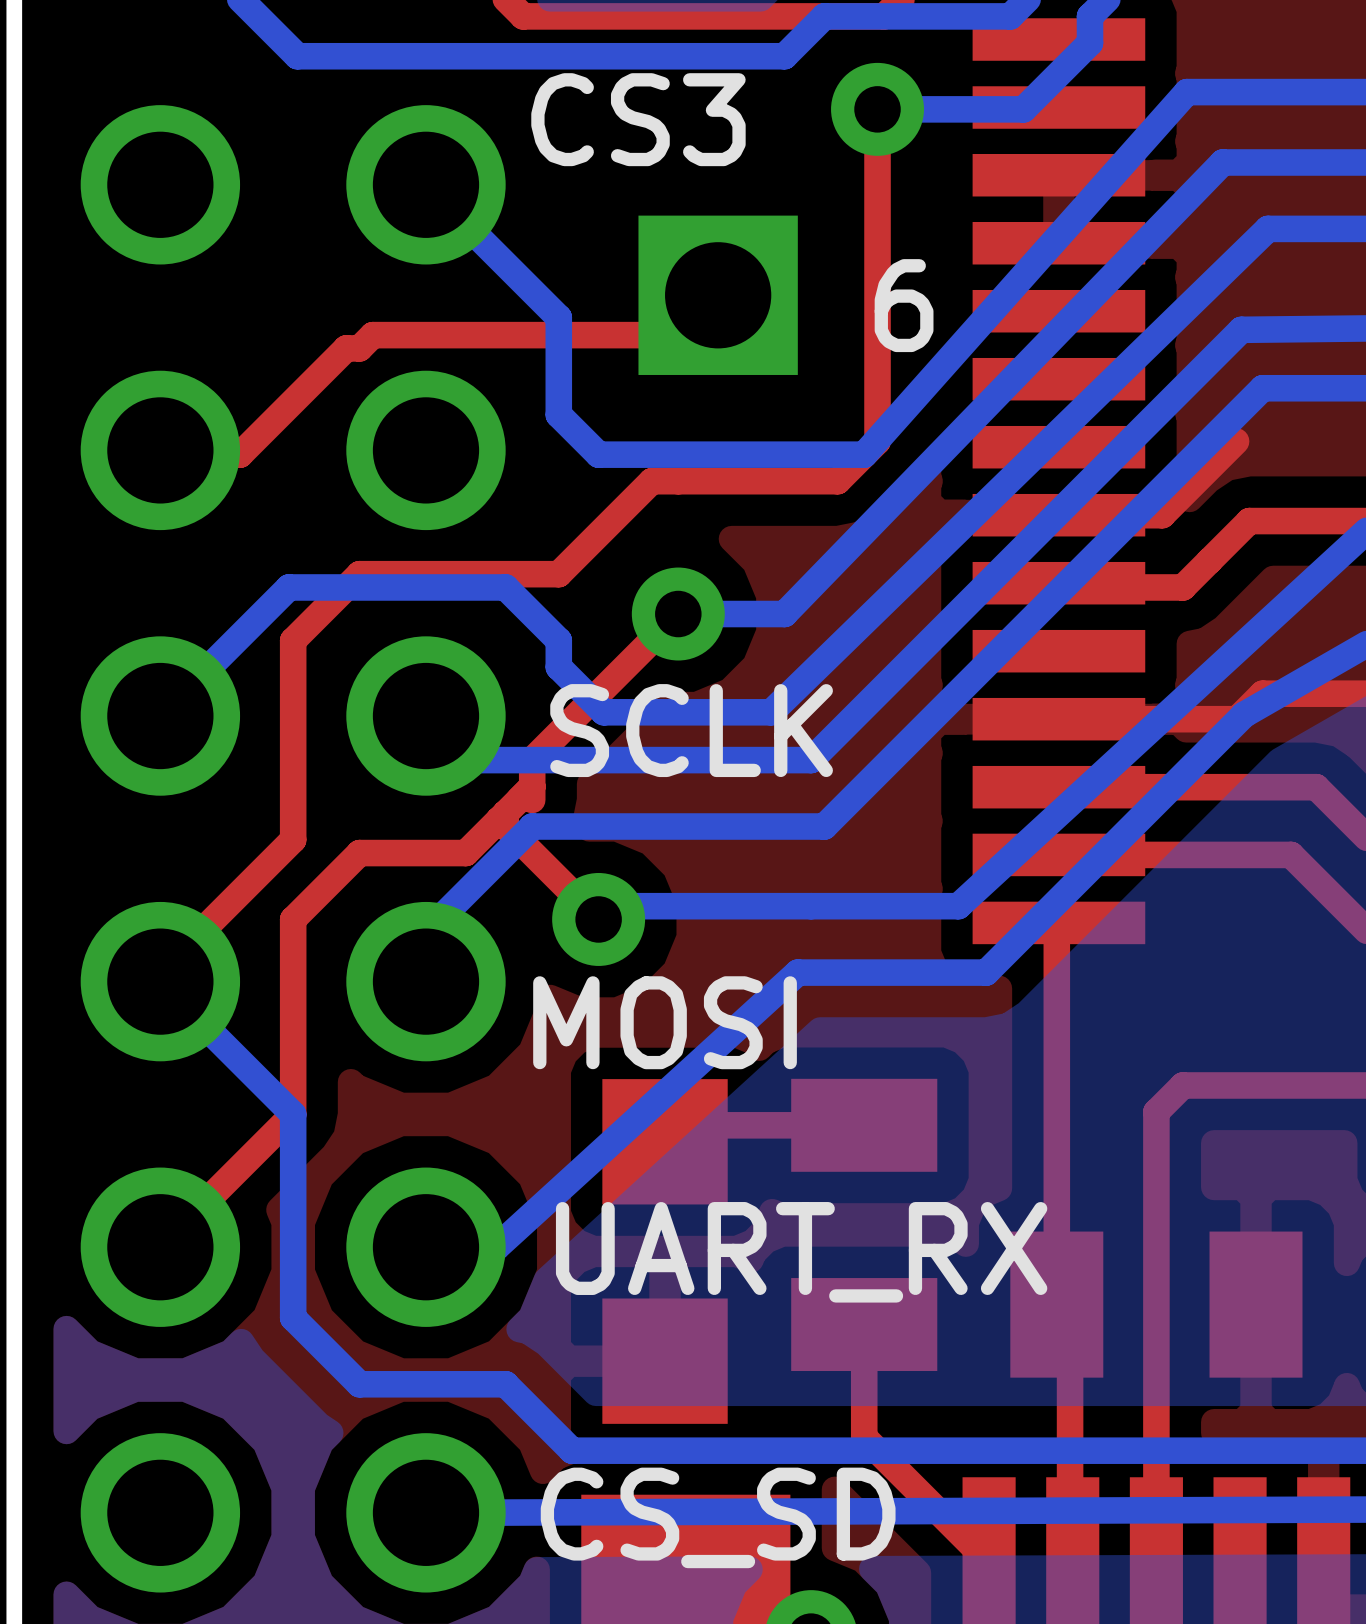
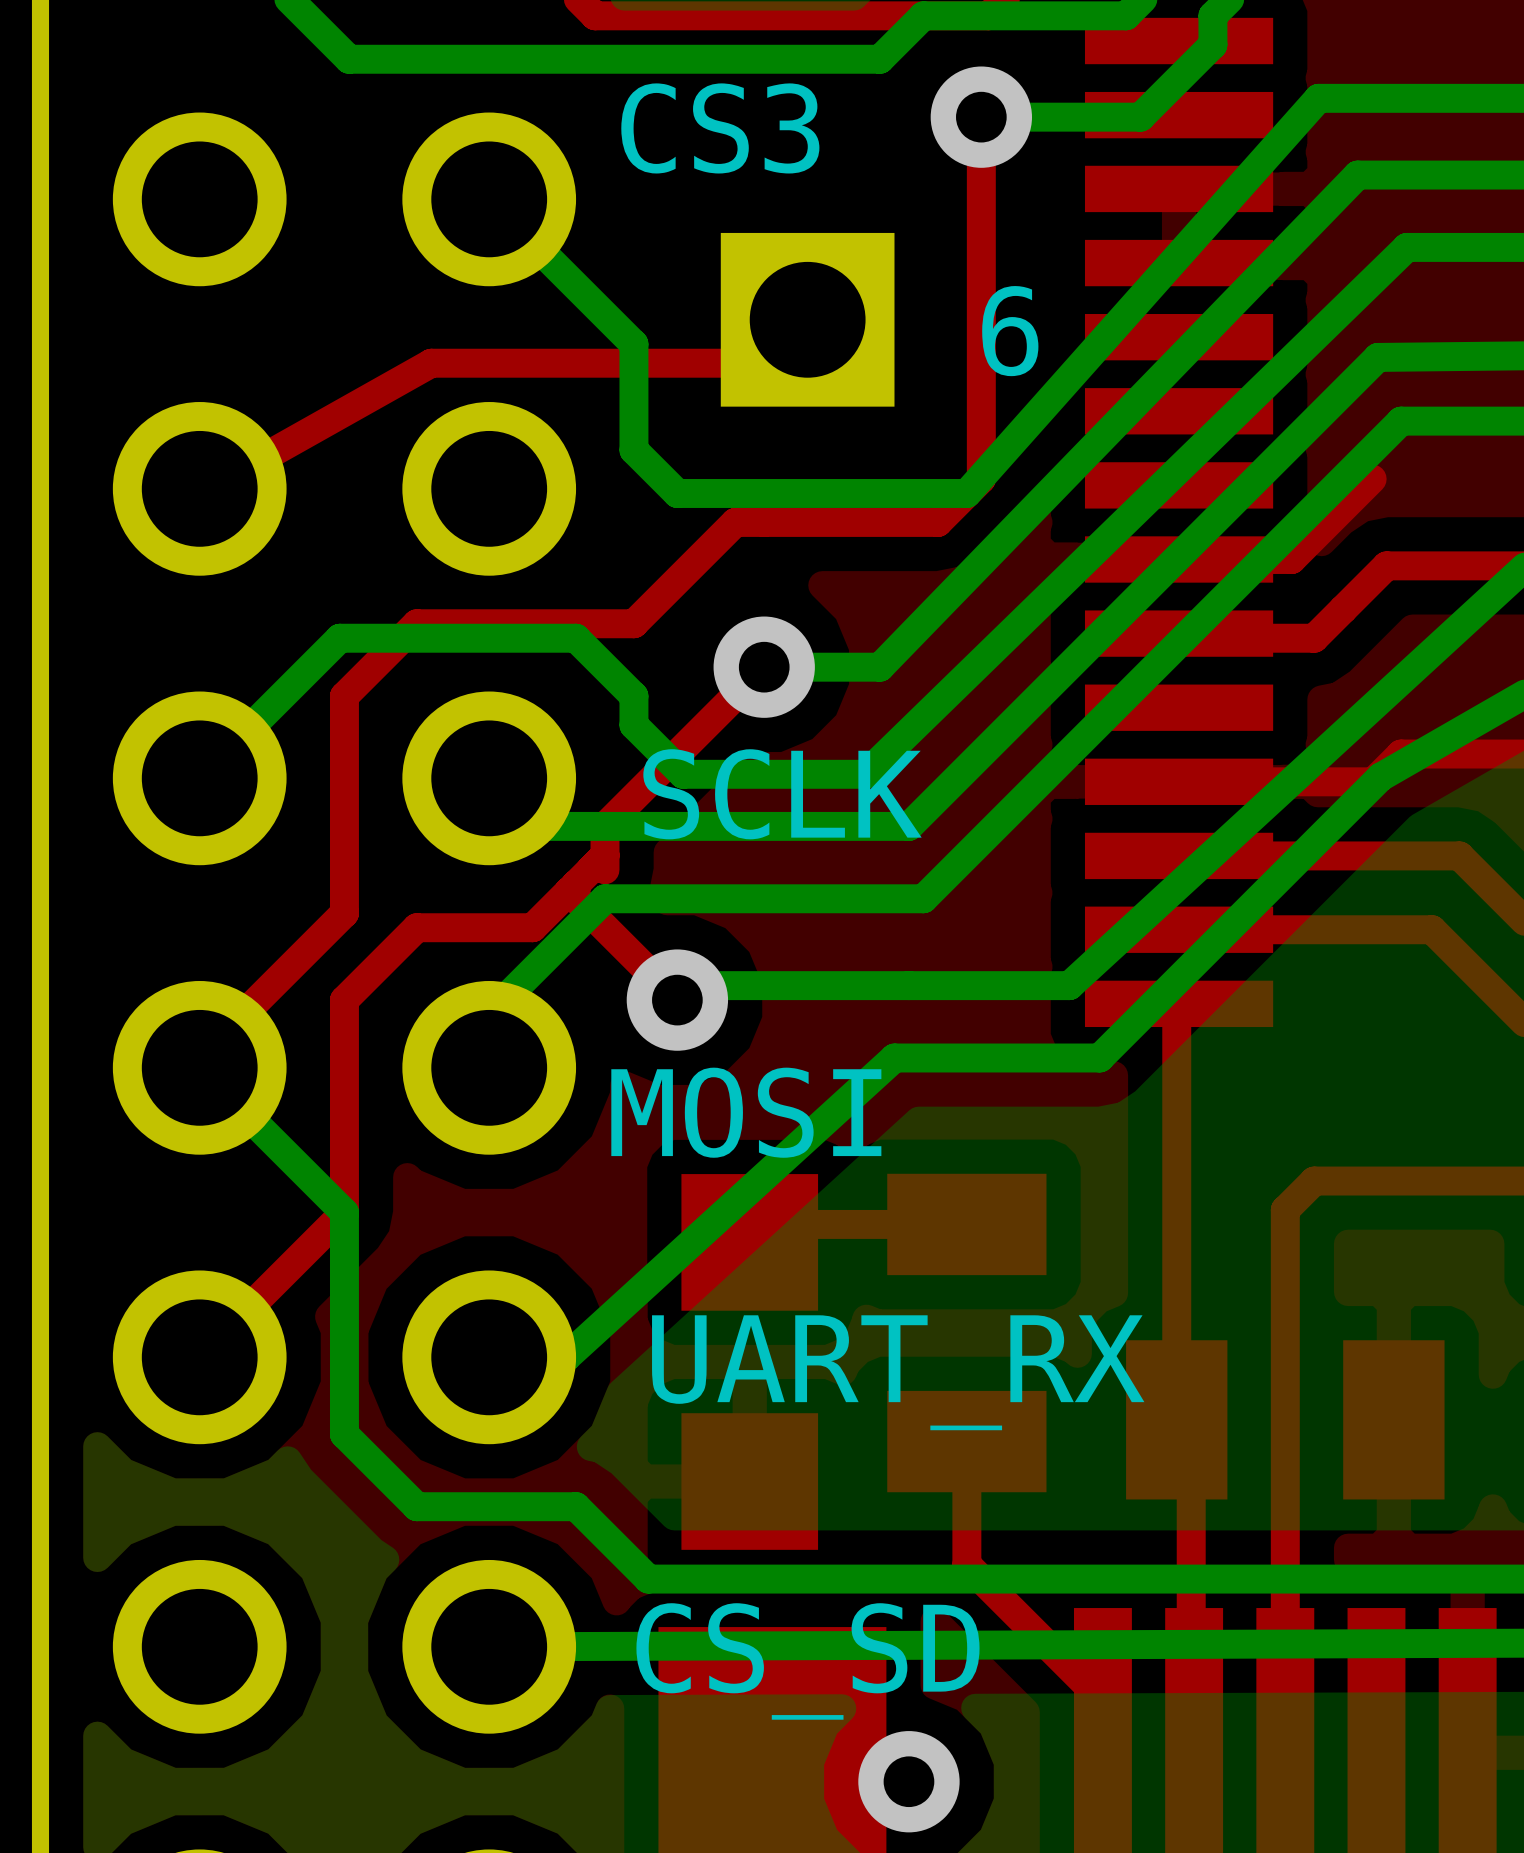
top track: (372, 335) (359, 348) (346, 348) (240, 454) (160, 454) (160, 450) -> (431, 363) (199, 493)

